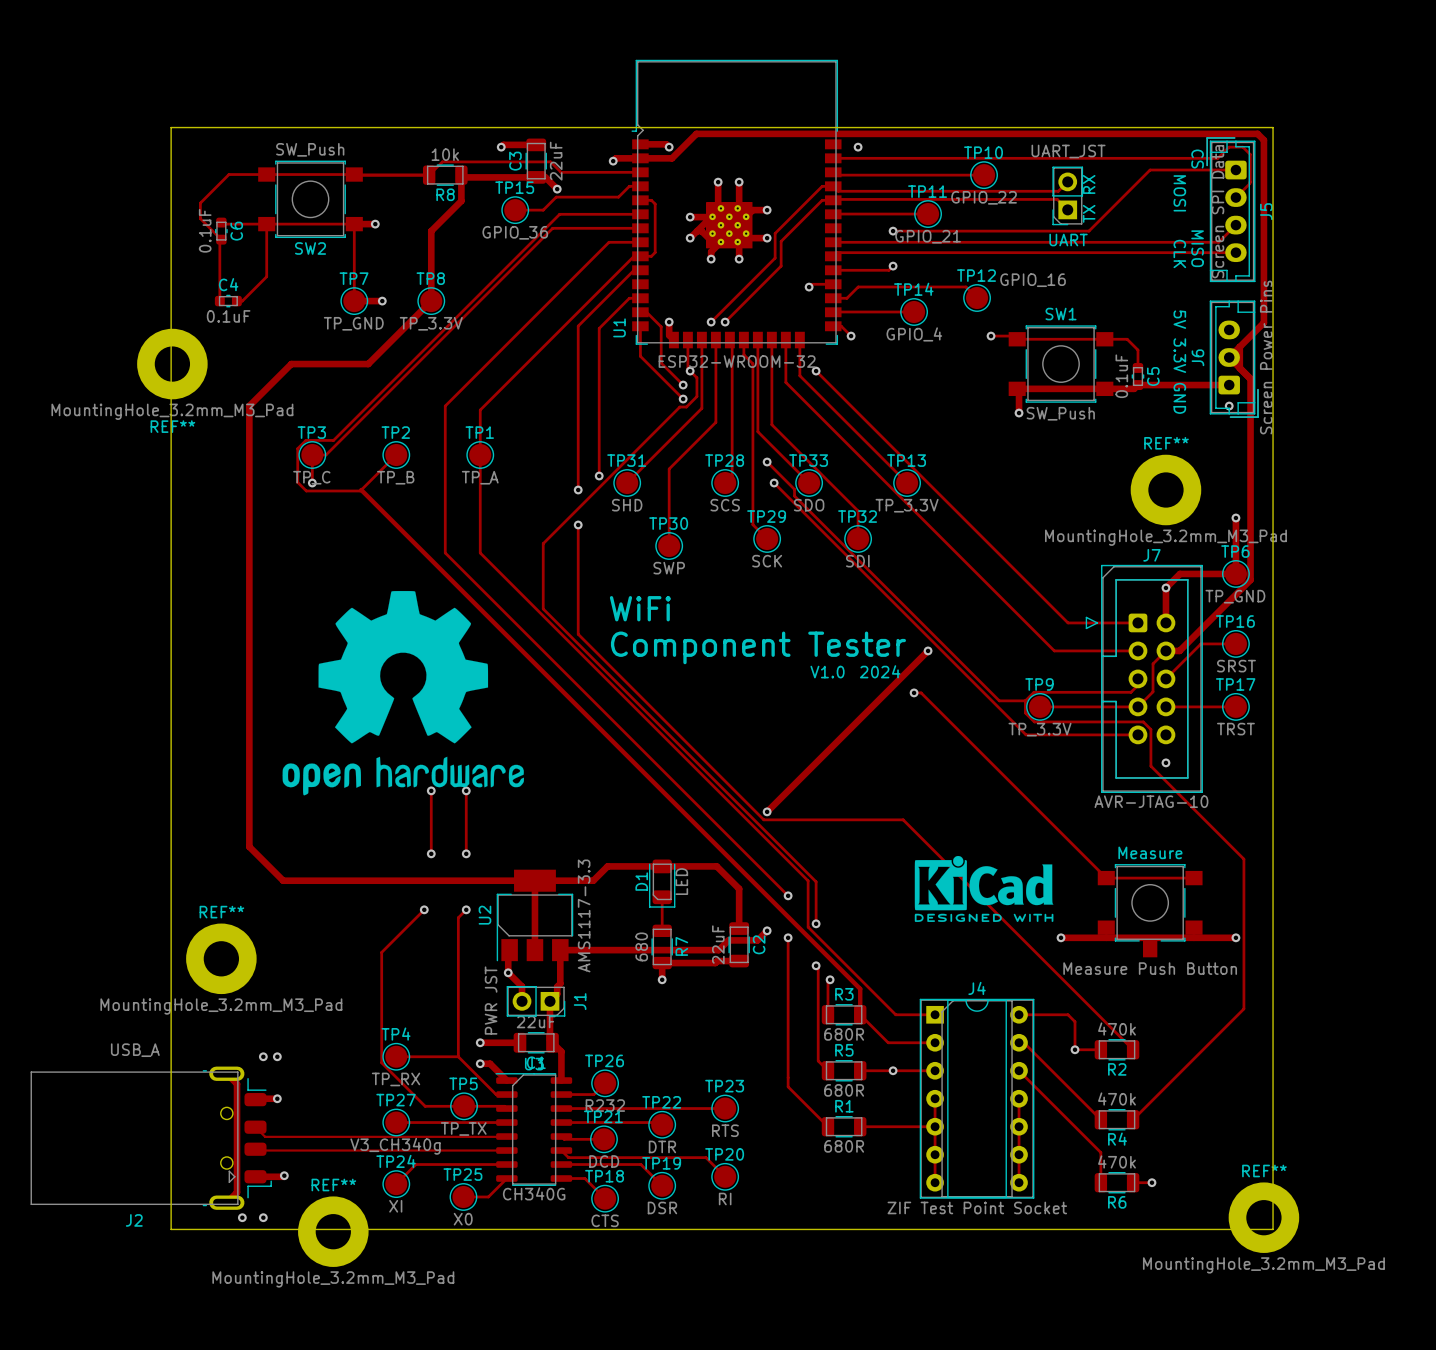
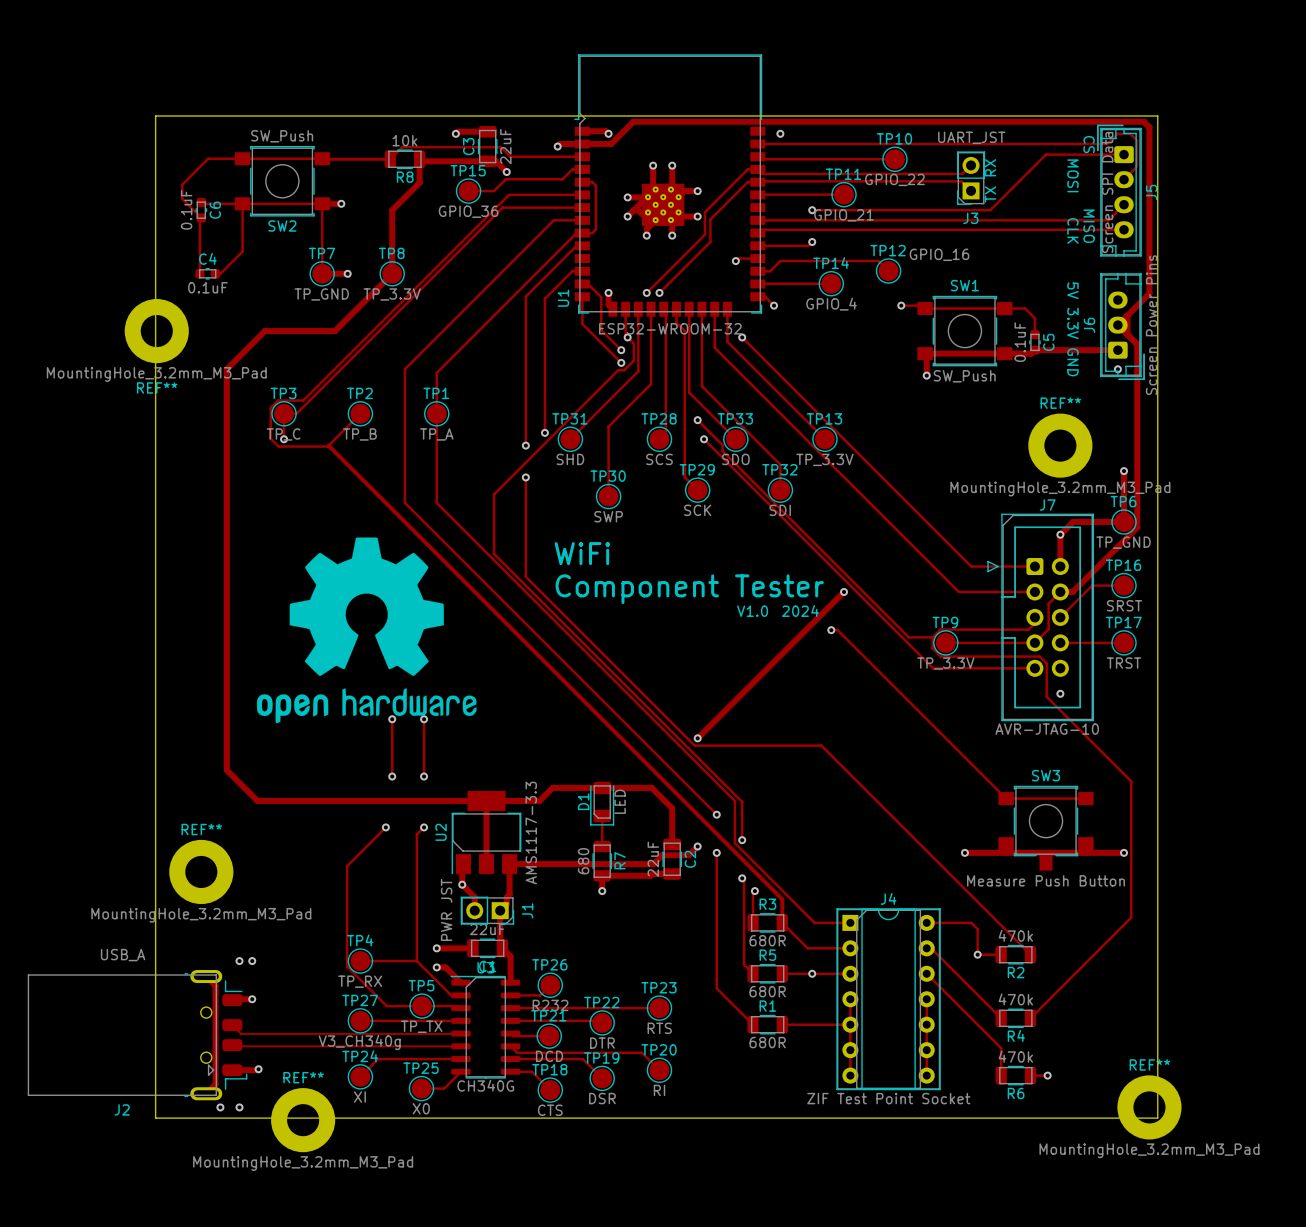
UART name: UART (1068, 240) -> J3 (970, 218)
Measure name: Measure (1150, 852) -> SW3 (1046, 775)
drawing: [914, 855, 1054, 922] -> none

